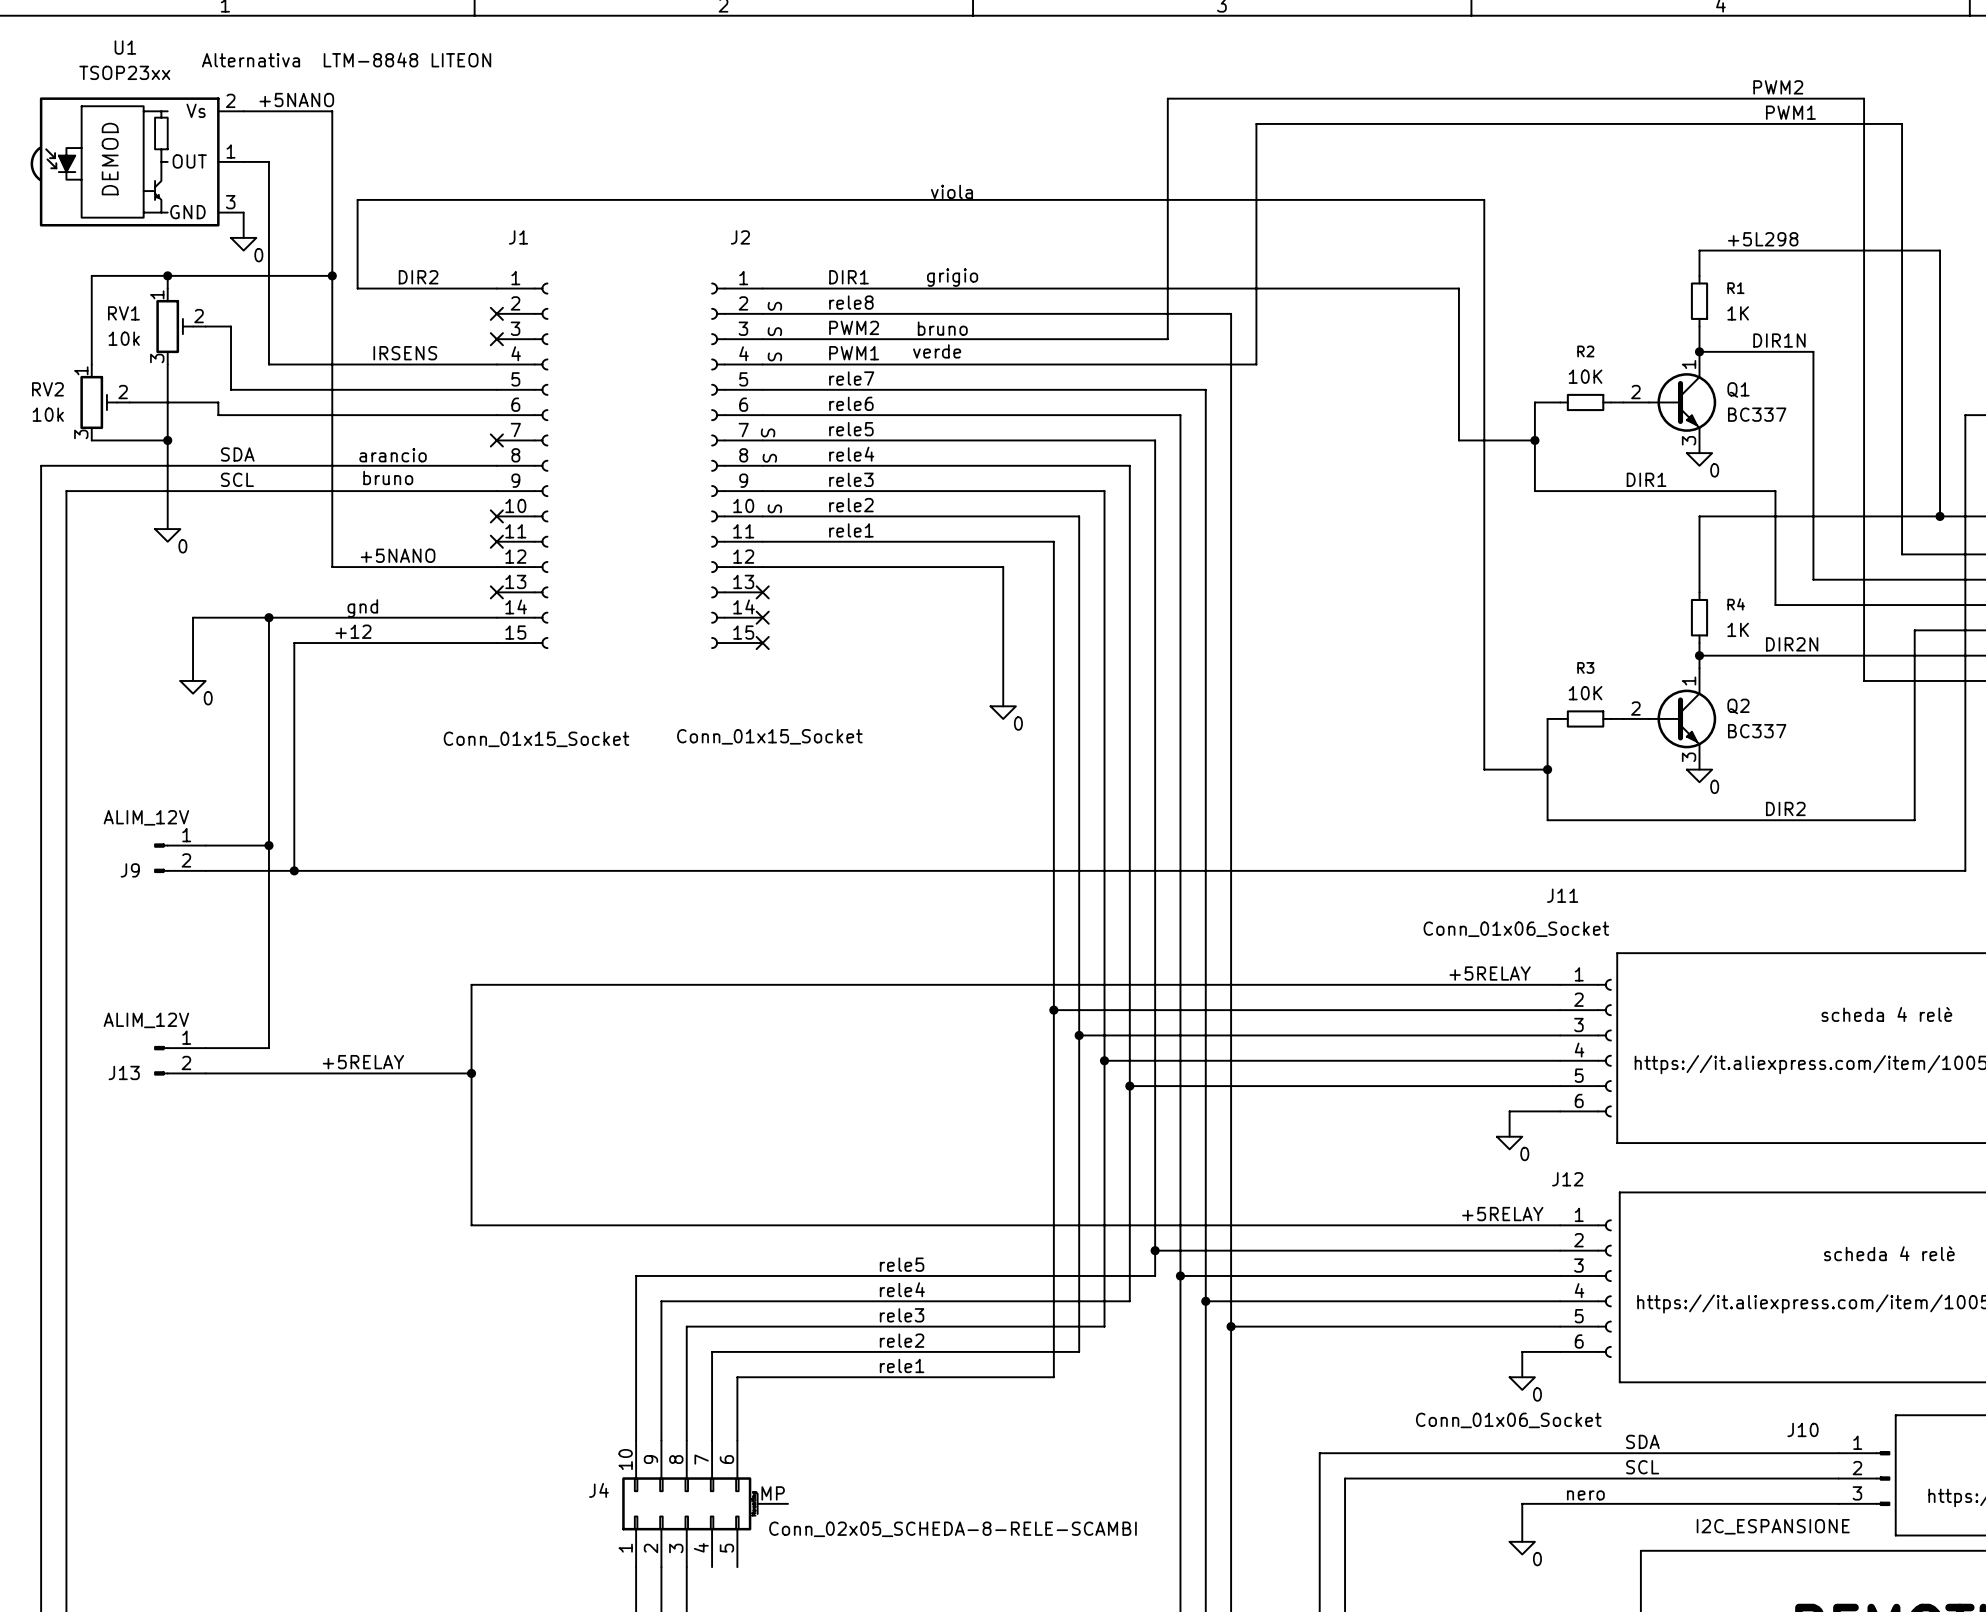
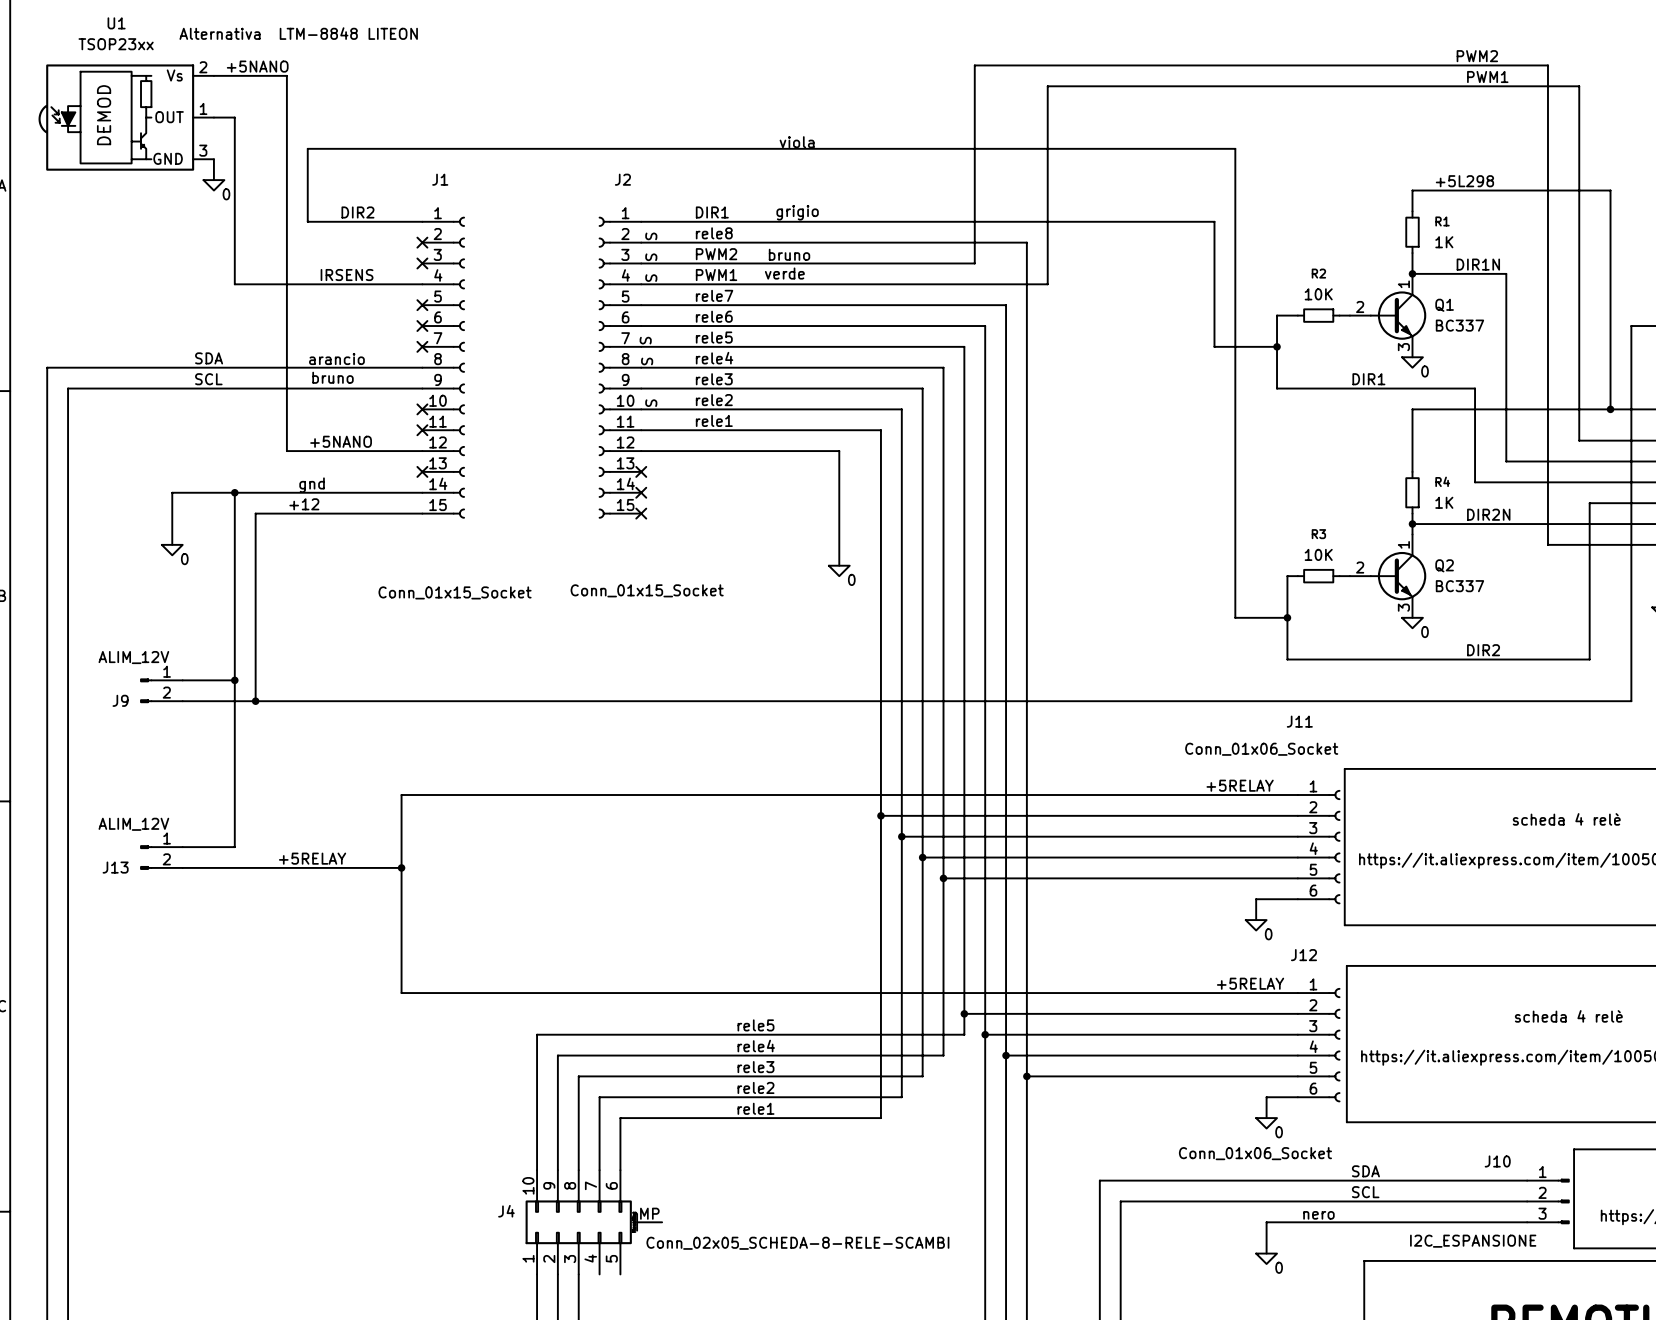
wire: (167, 275) (167, 288) -> none
junction: (167, 275) -> none
wire: (332, 275) (91, 275) (91, 364) -> none
junction: (332, 275) -> none
RV1: 10k (181, 326) -> none
wire: (205, 326) (231, 326) (231, 389) (496, 389) -> none
wire: (167, 364) (167, 529) -> none
no-connect mark: none -> (422, 305)
RV2: 10k (105, 402) -> none
wire: (129, 402) (218, 402) (218, 415) (496, 415) -> none
no-connect mark: none -> (422, 326)
wire: (91, 440) (167, 440) -> none
junction: (167, 440) -> none
power symbol: 0 (167, 535) -> none

